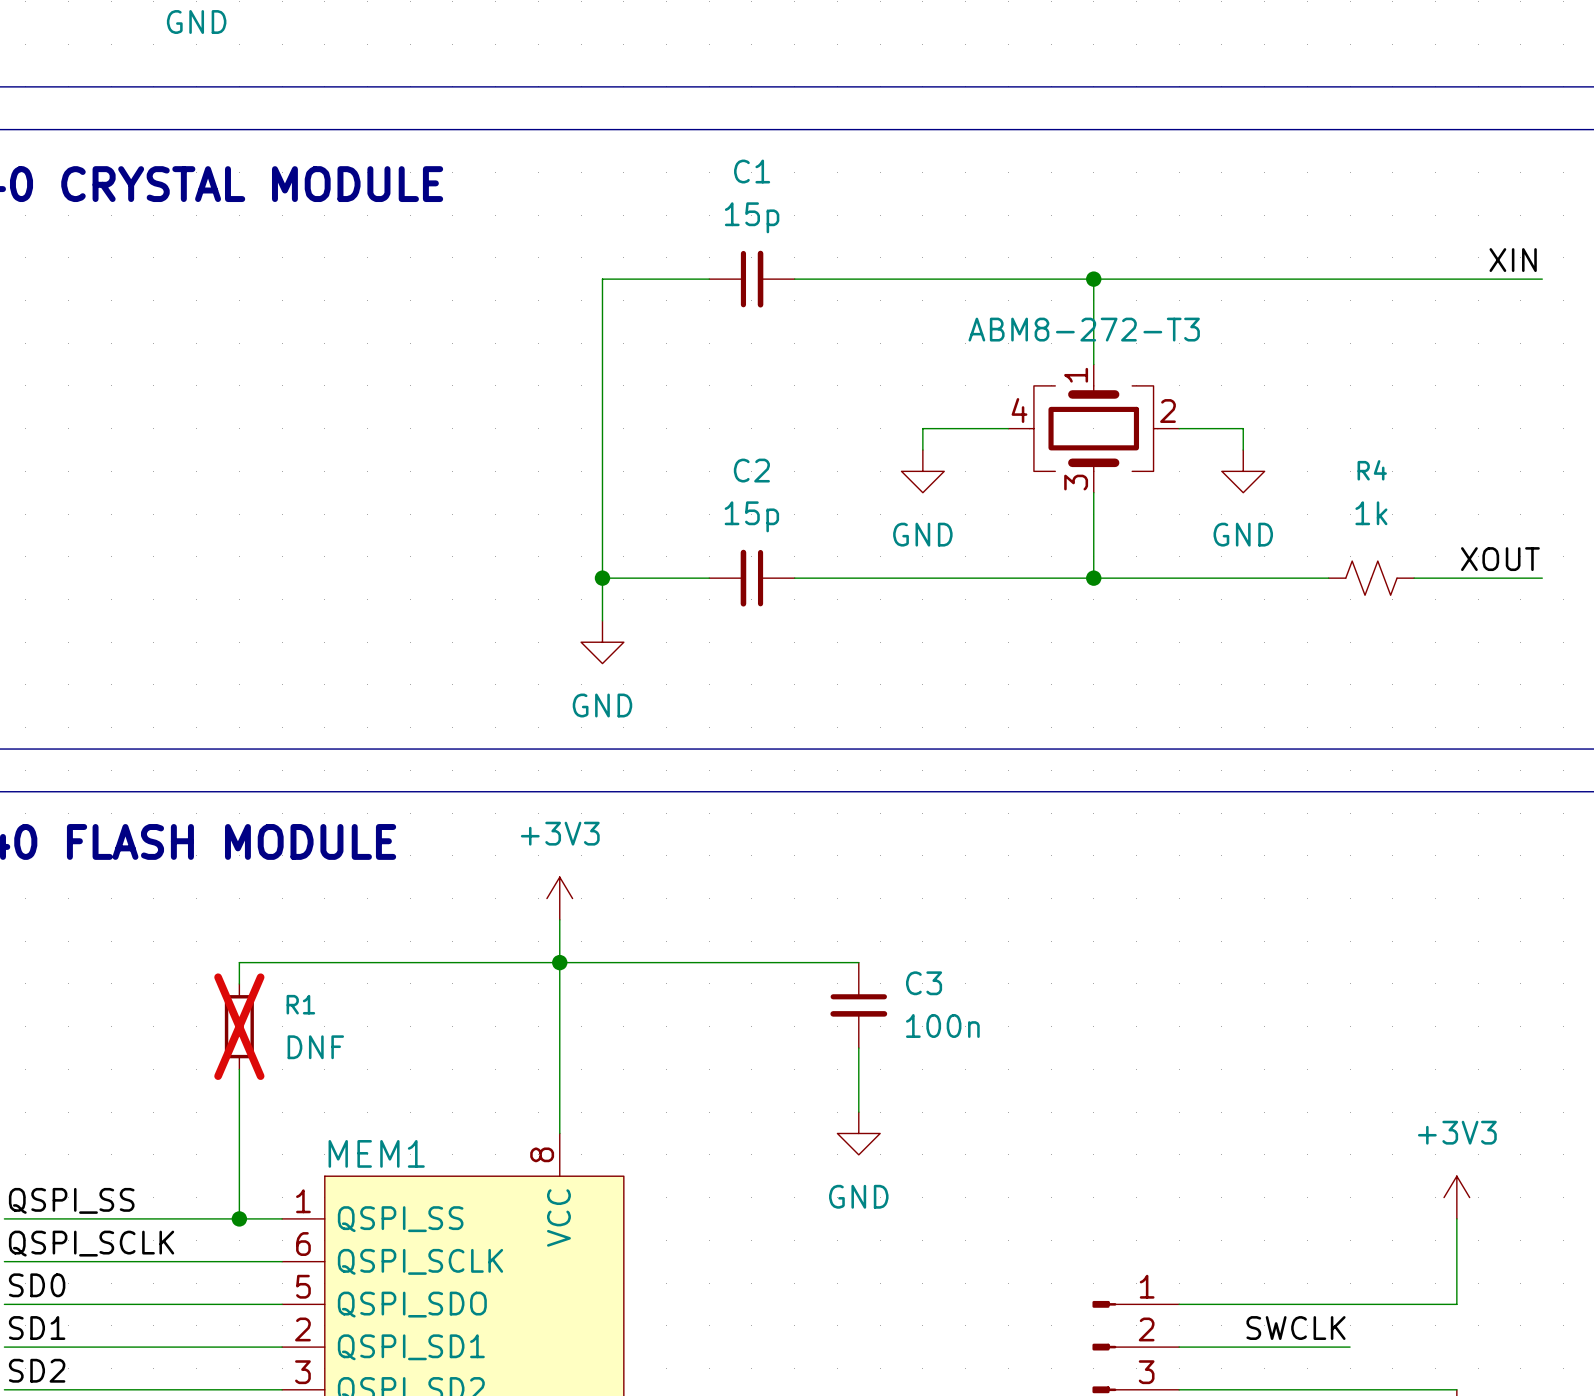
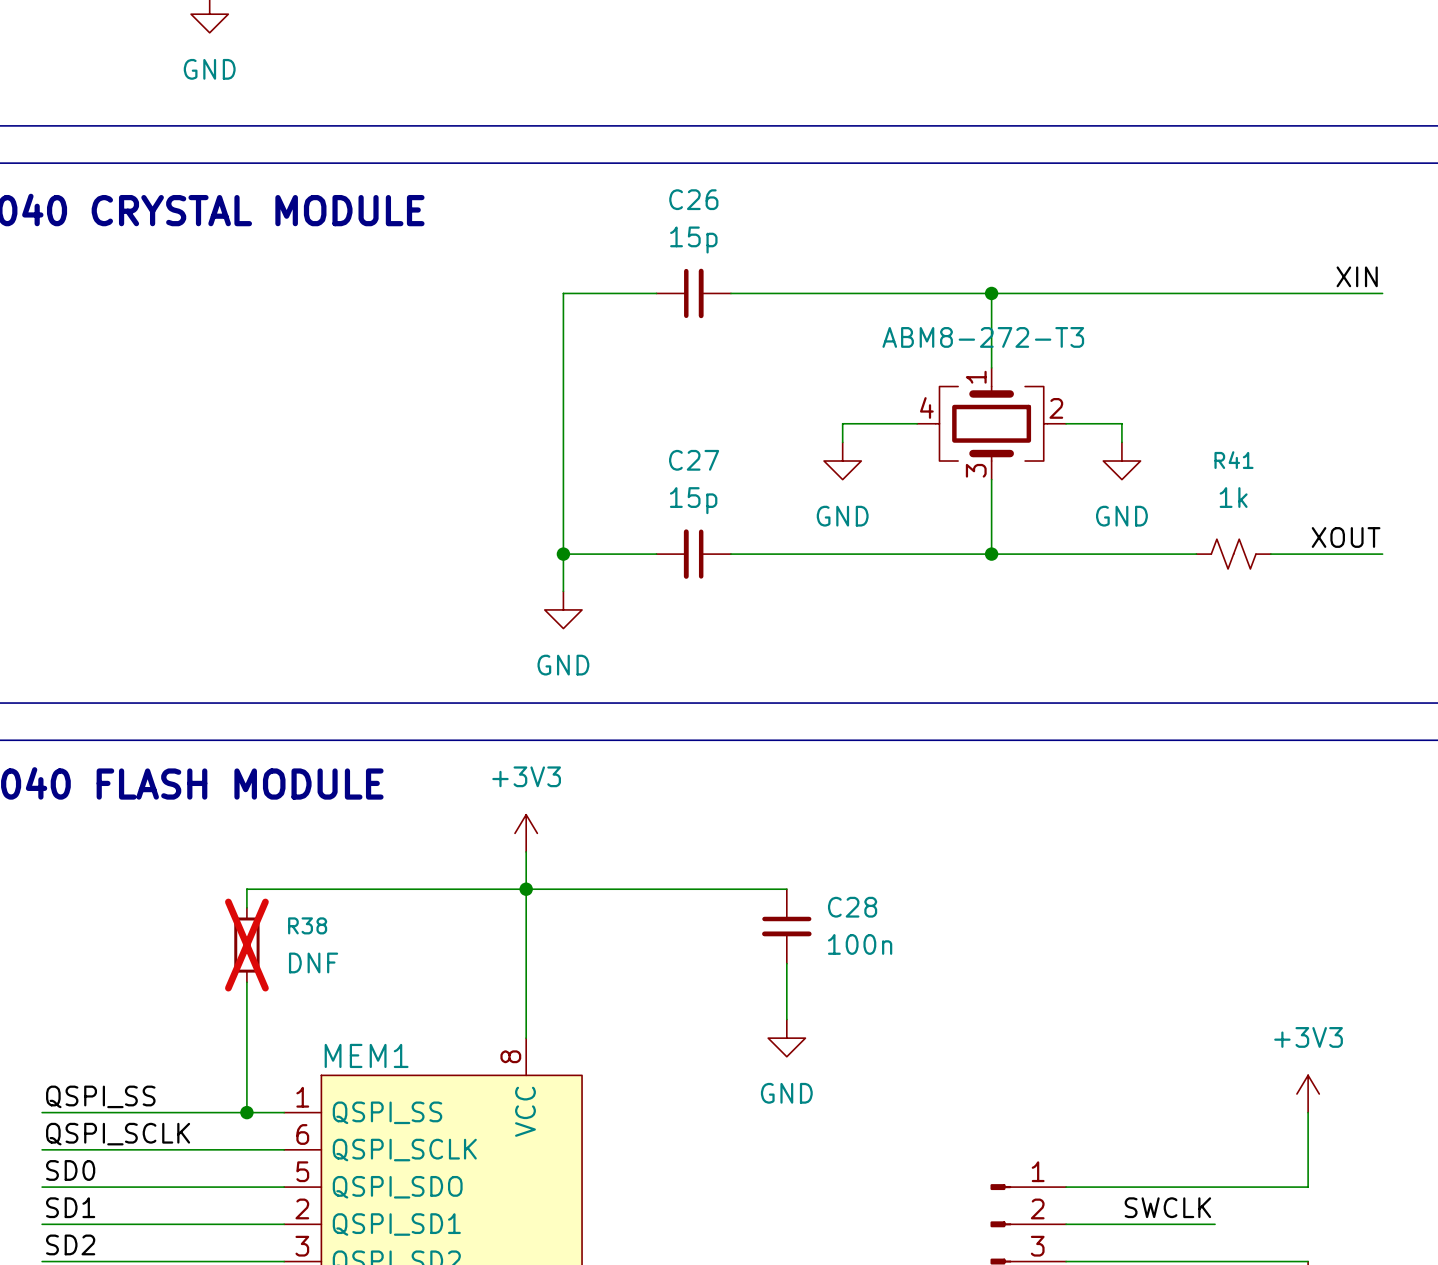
C1 name: C1 (752, 171) -> C26 (693, 199)
C2 name: C2 (751, 470) -> C27 (694, 460)
R4 name: R4 (1372, 470) -> R41 (1233, 460)
C3 name: C3 (924, 983) -> C28 (852, 907)
R1 name: R1 (300, 1004) -> R38 (307, 925)

